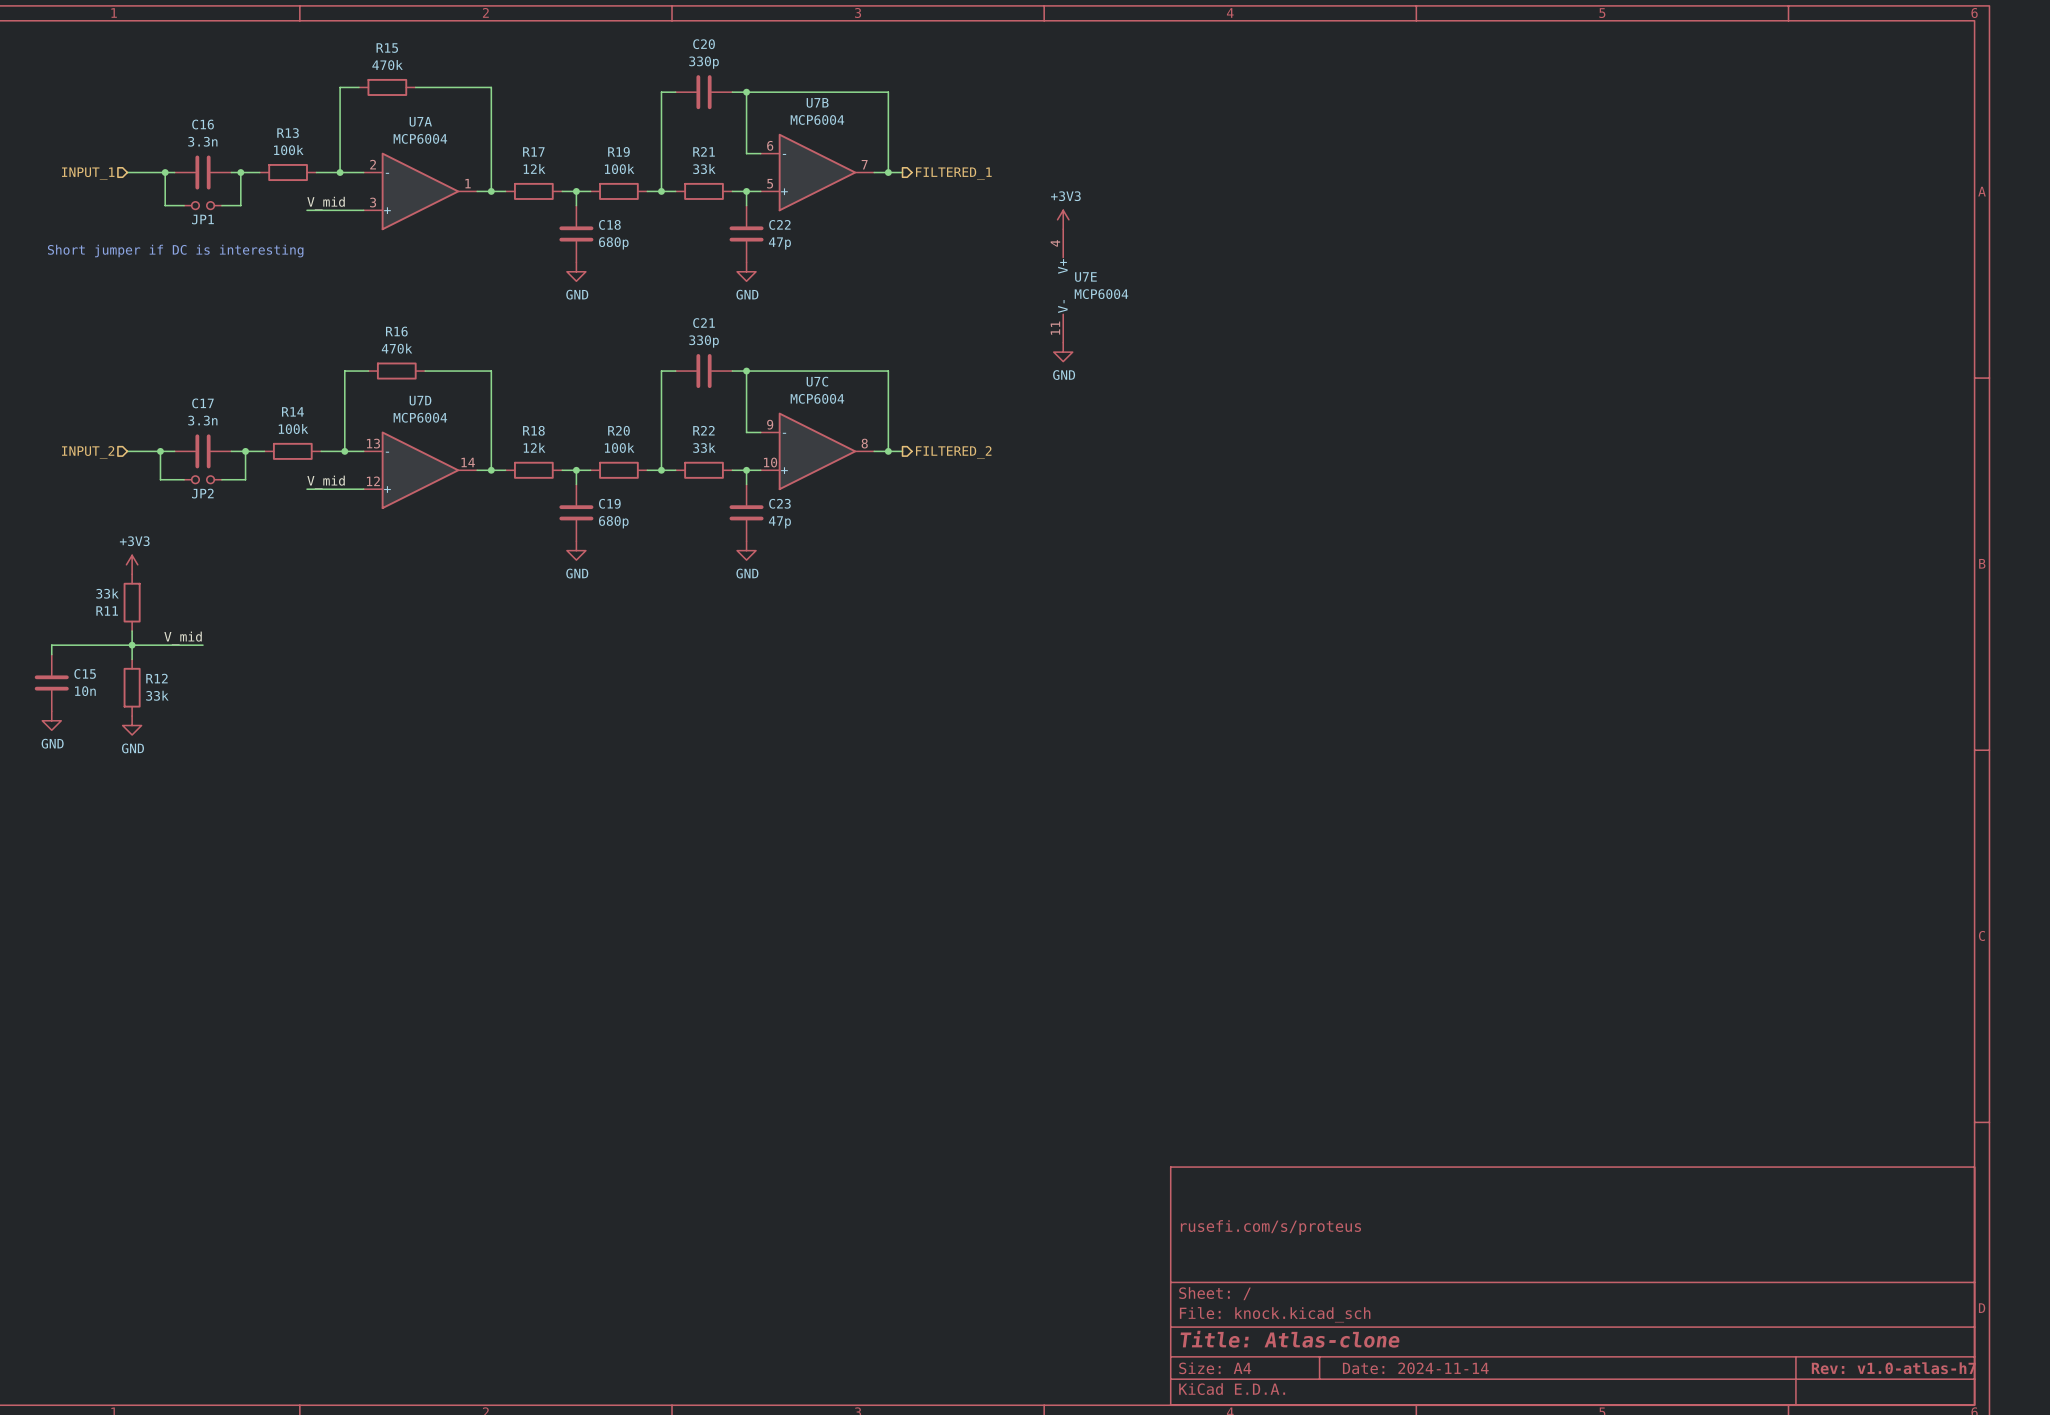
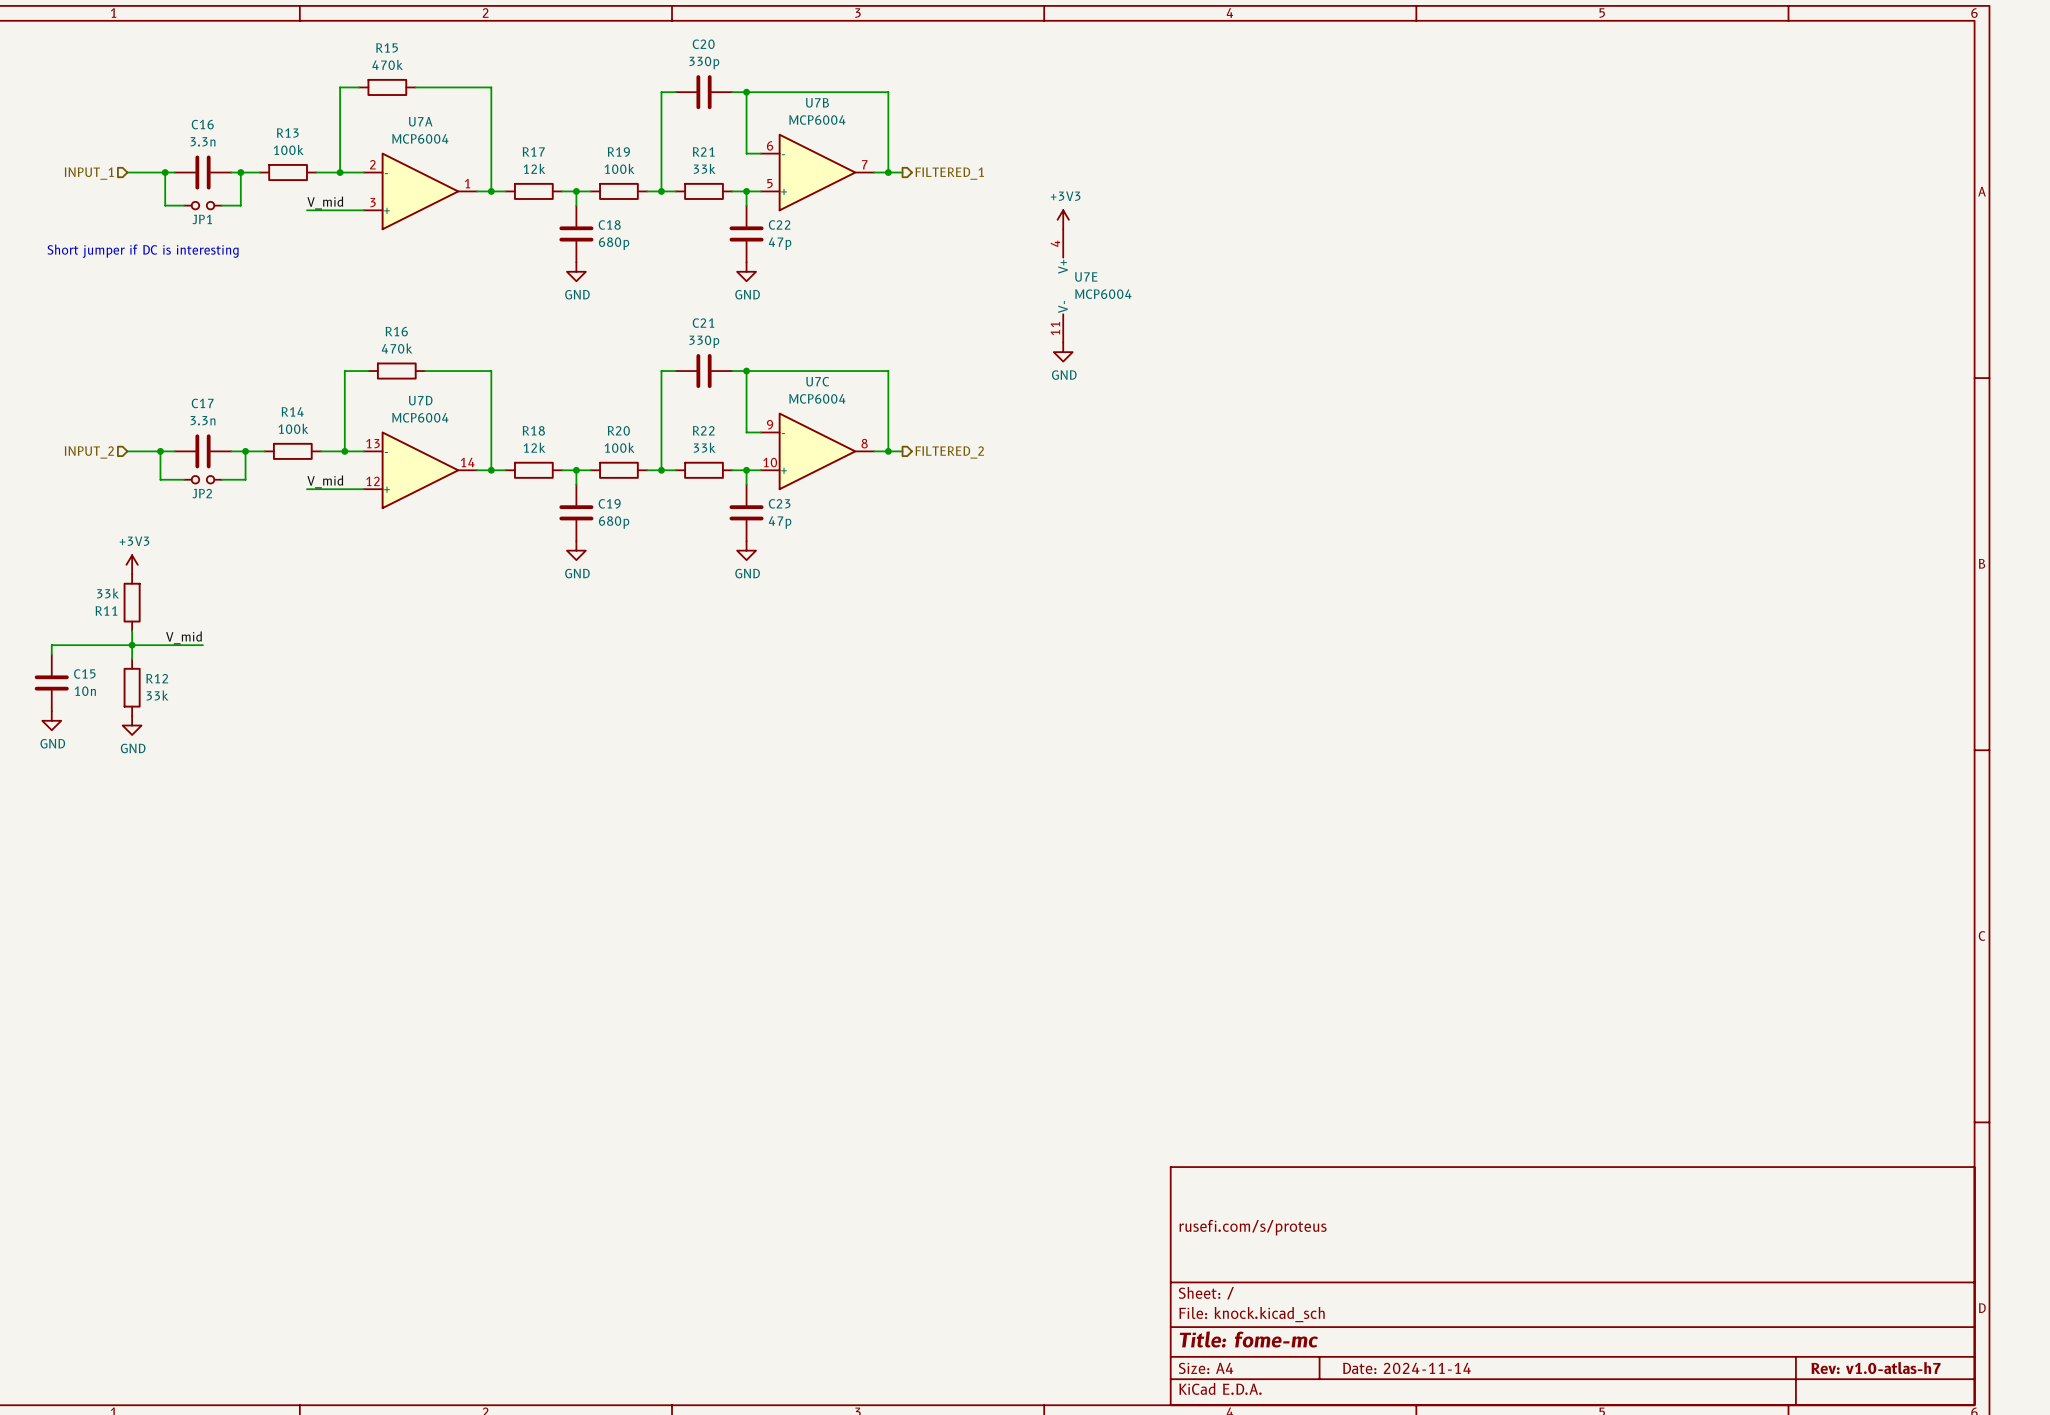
title block: Title: Atlas-clone (1290, 1339) -> Title: fome-mc (1248, 1339)

